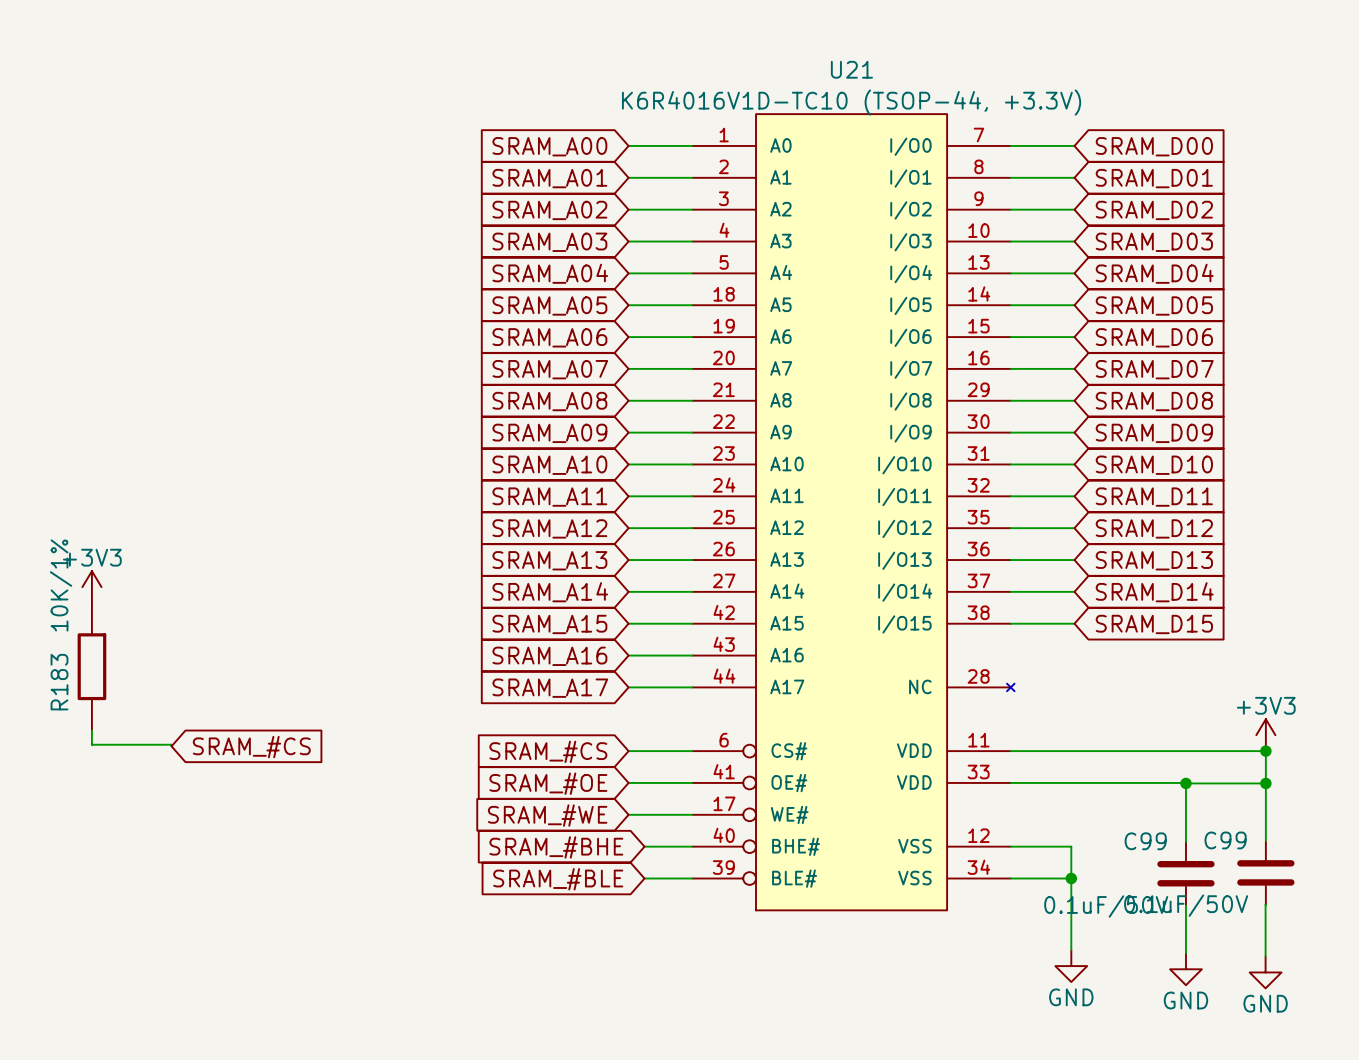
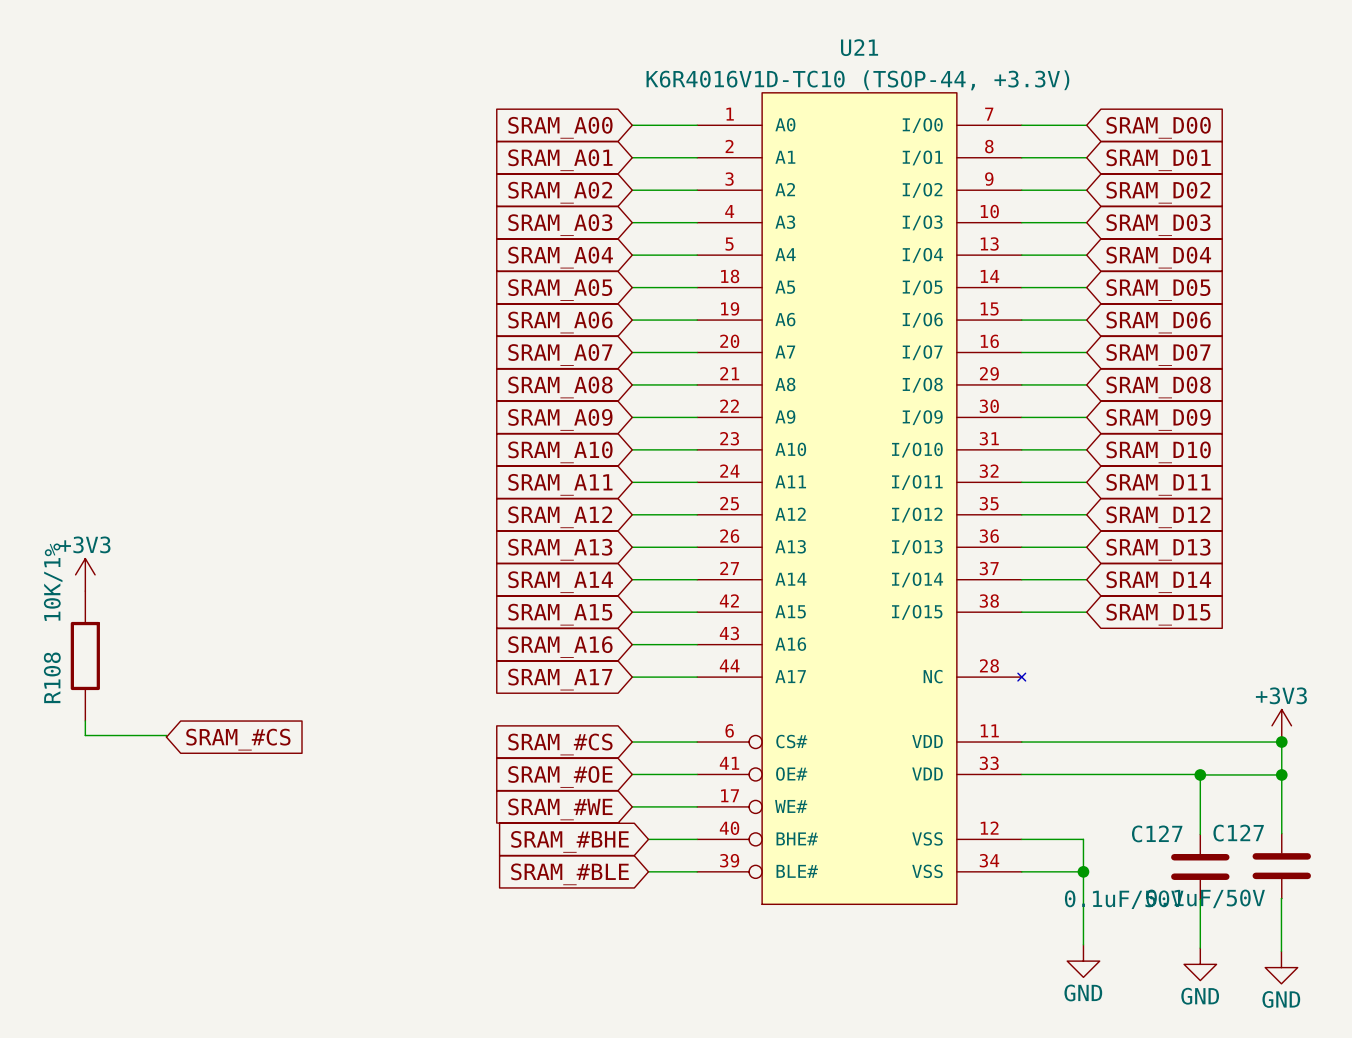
R183 name: R183 (59, 682) -> R108 (52, 677)
C99 name: C99 (1225, 840) -> C127 (1238, 833)
C99 name: C99 (1145, 841) -> C127 (1157, 833)

